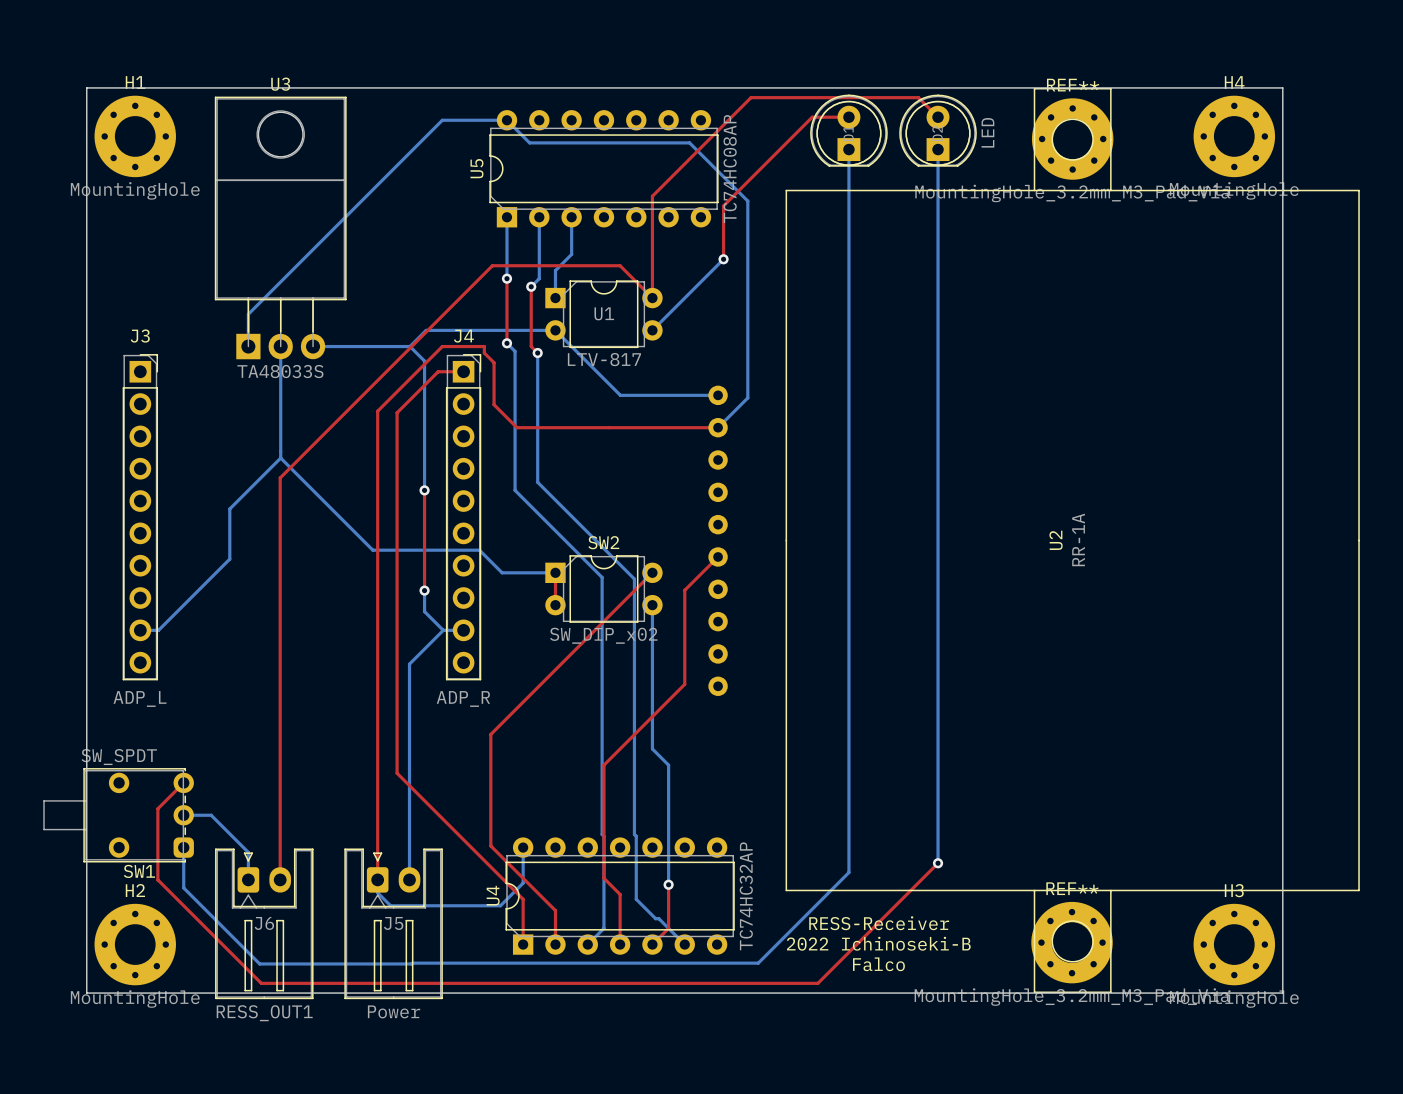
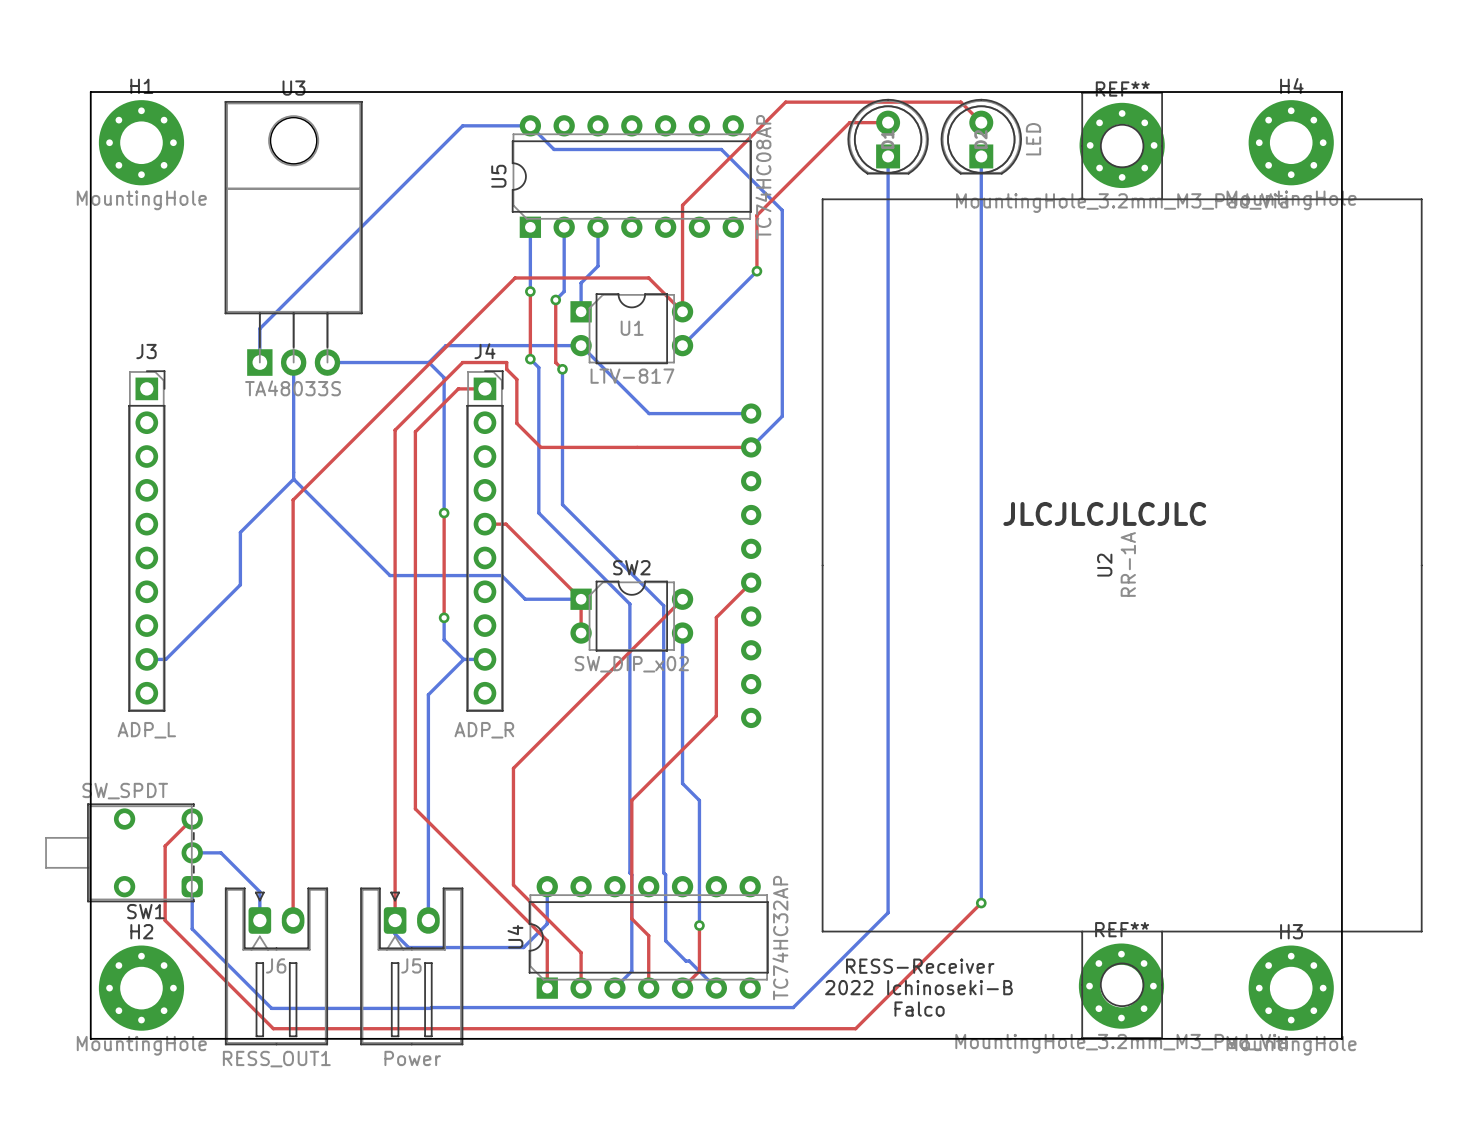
text: none -> JLCJLCJLCJLC (1104, 513)
top track: none -> (484, 524) (506, 524) (581, 599)

